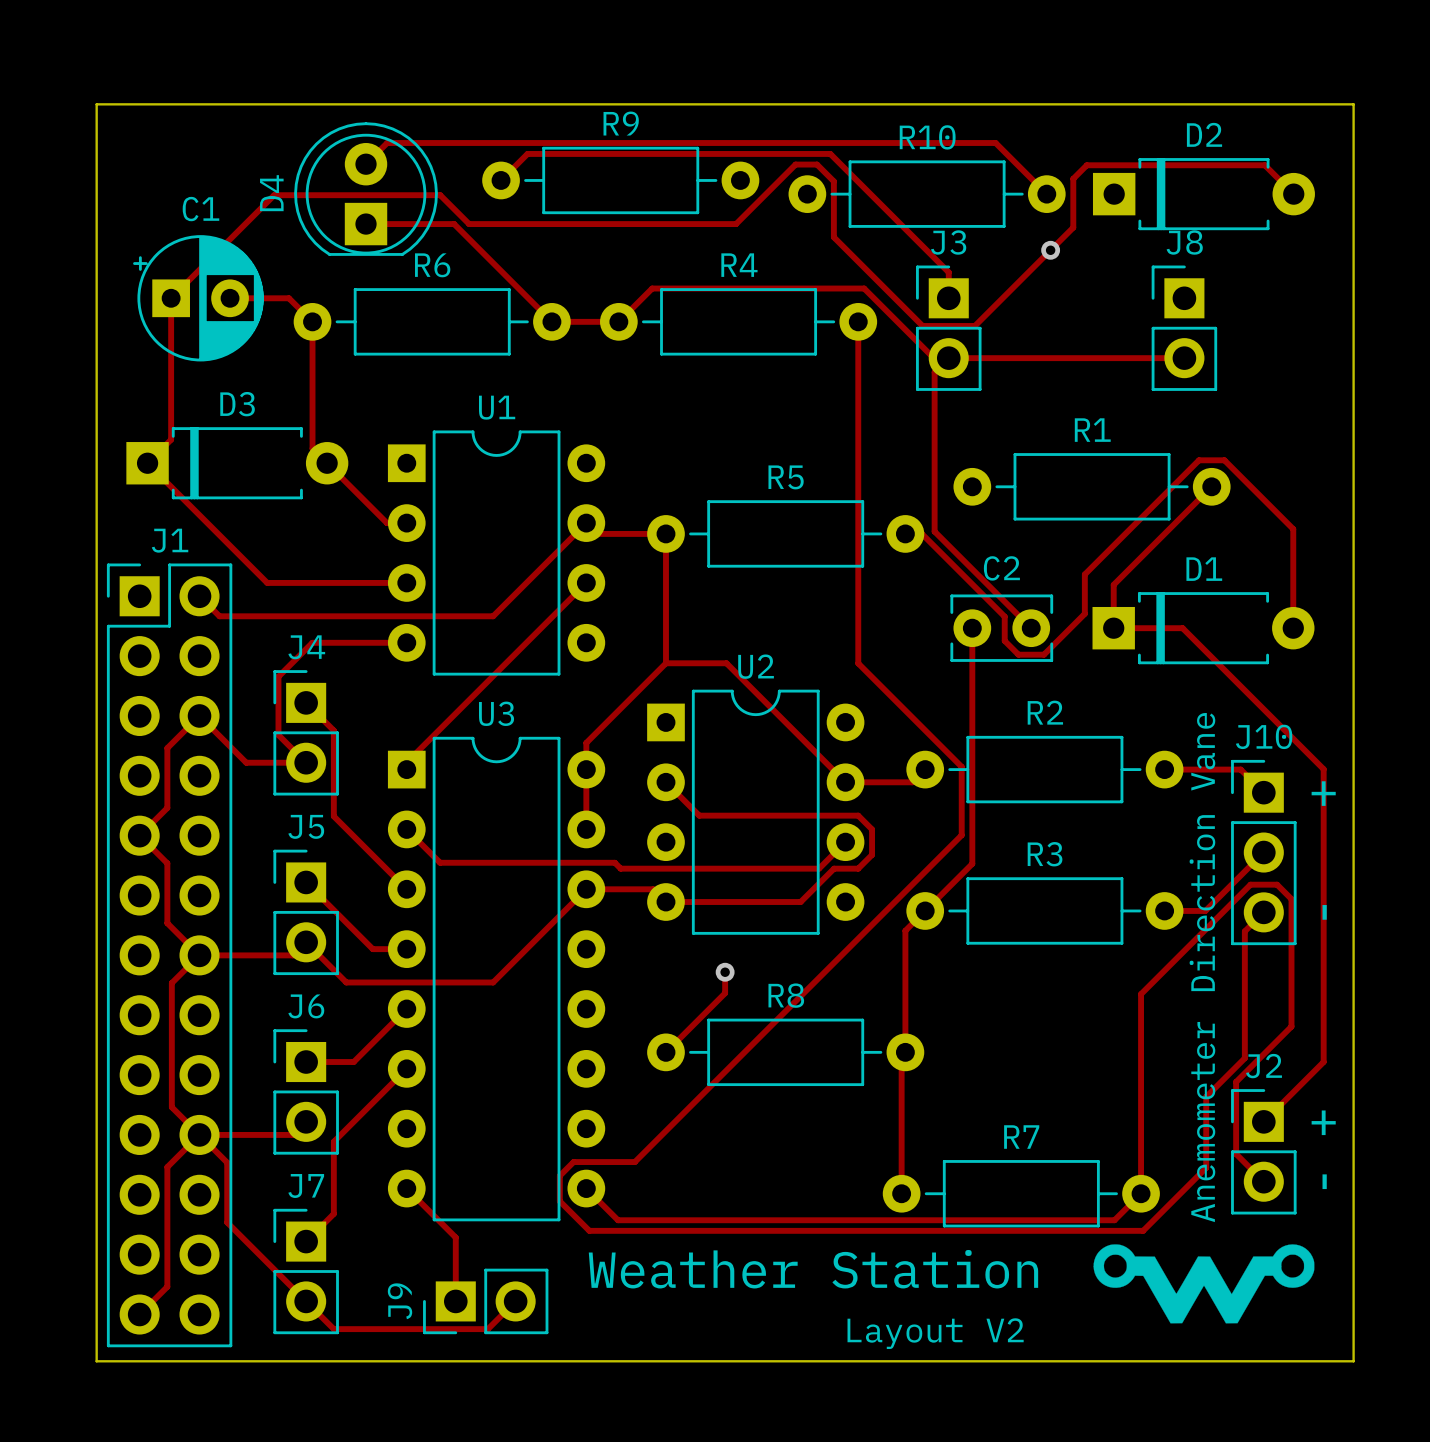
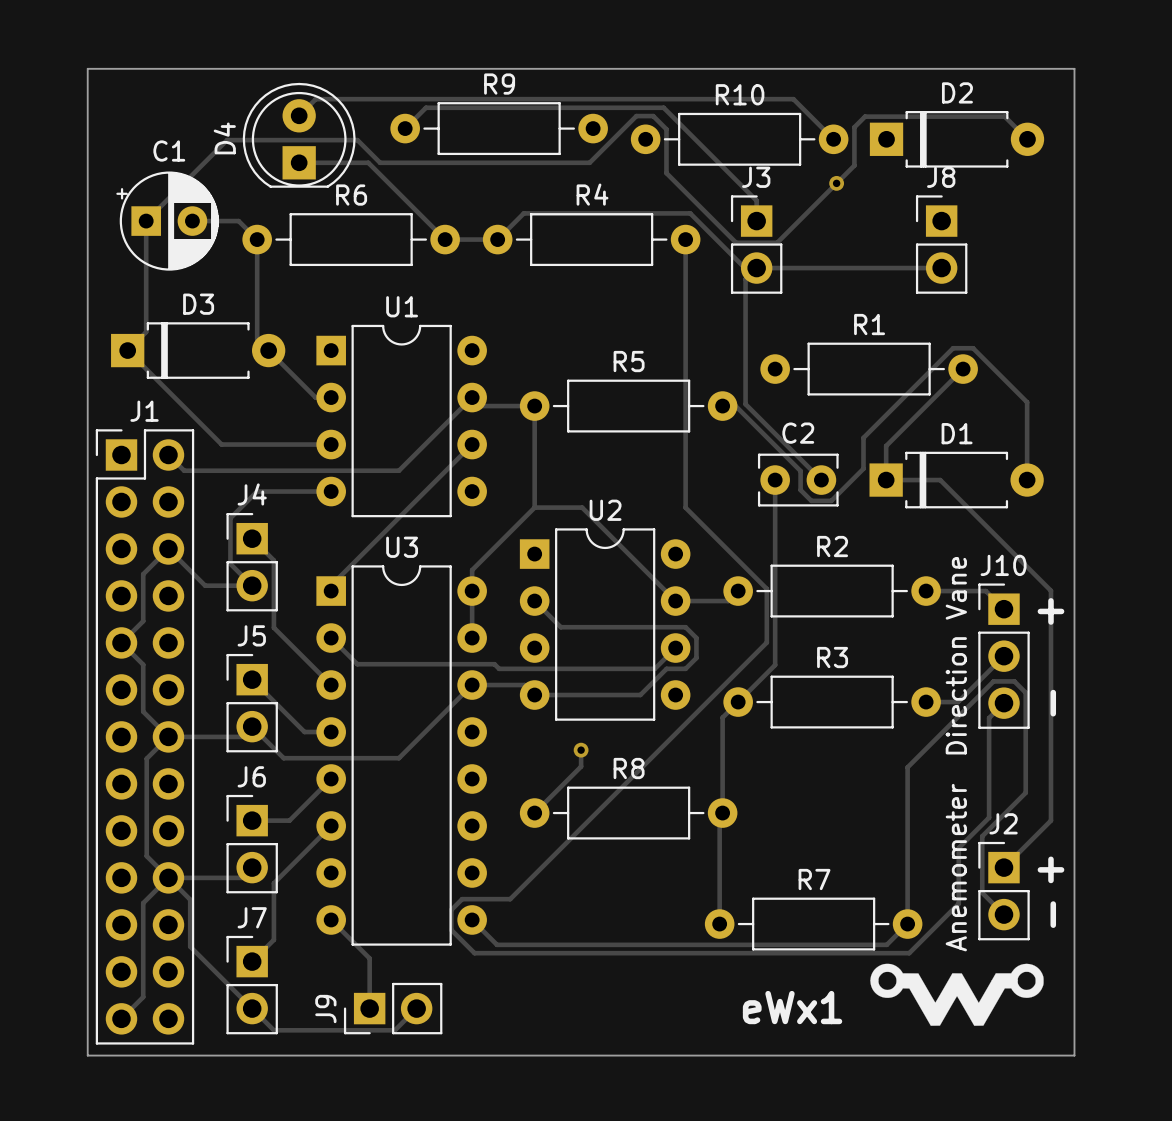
text: Weather Station (813, 1269) -> none
text: none -> eWx1 (792, 1007)
text: Layout V2 (935, 1333) -> none

